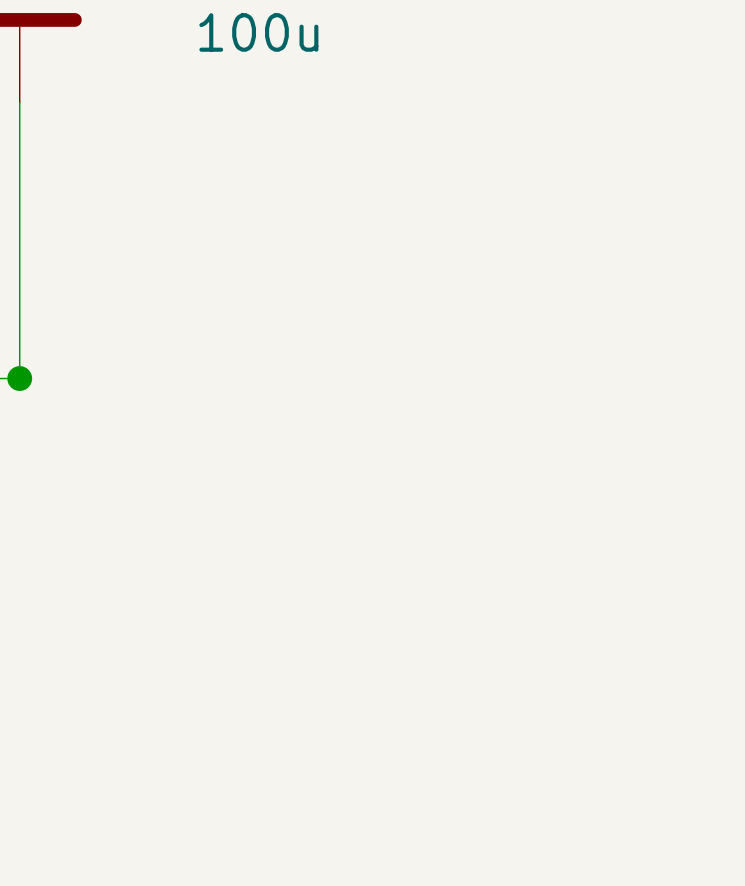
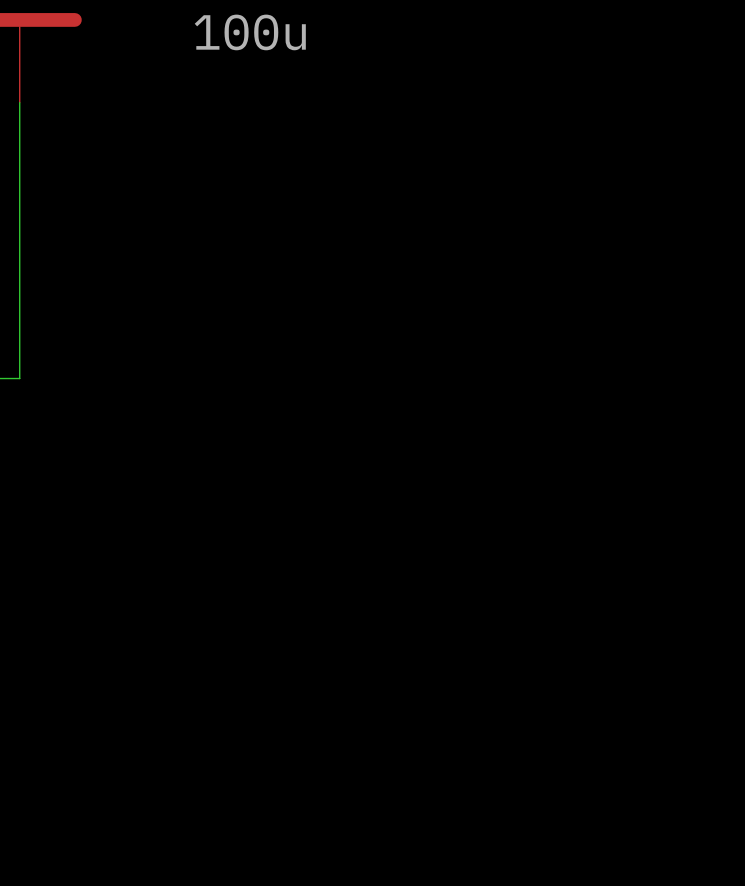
junction: (19, 378) -> none

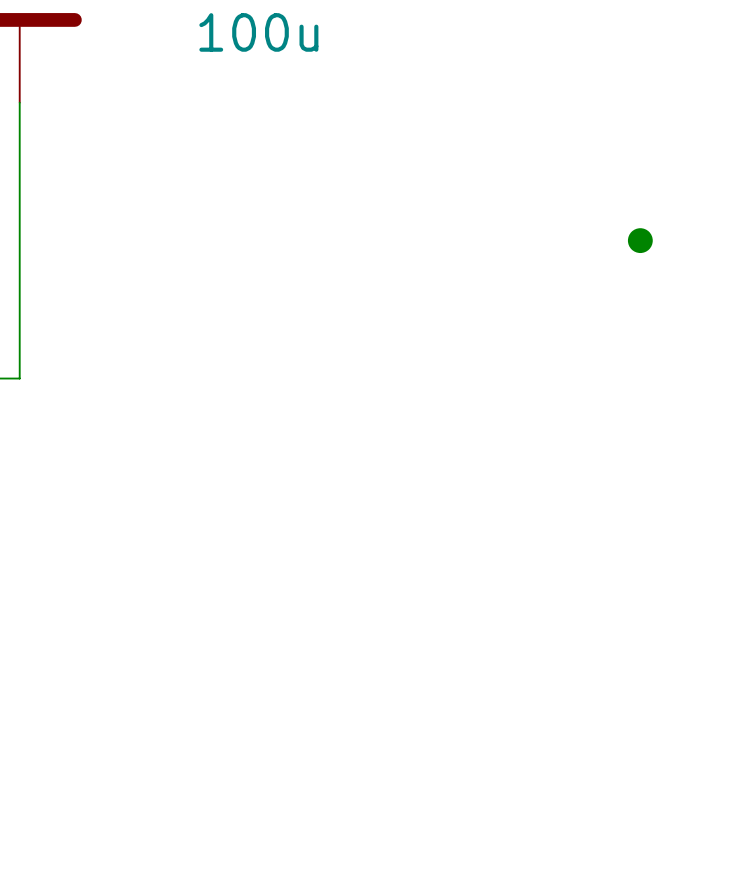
junction: none -> (640, 240)

